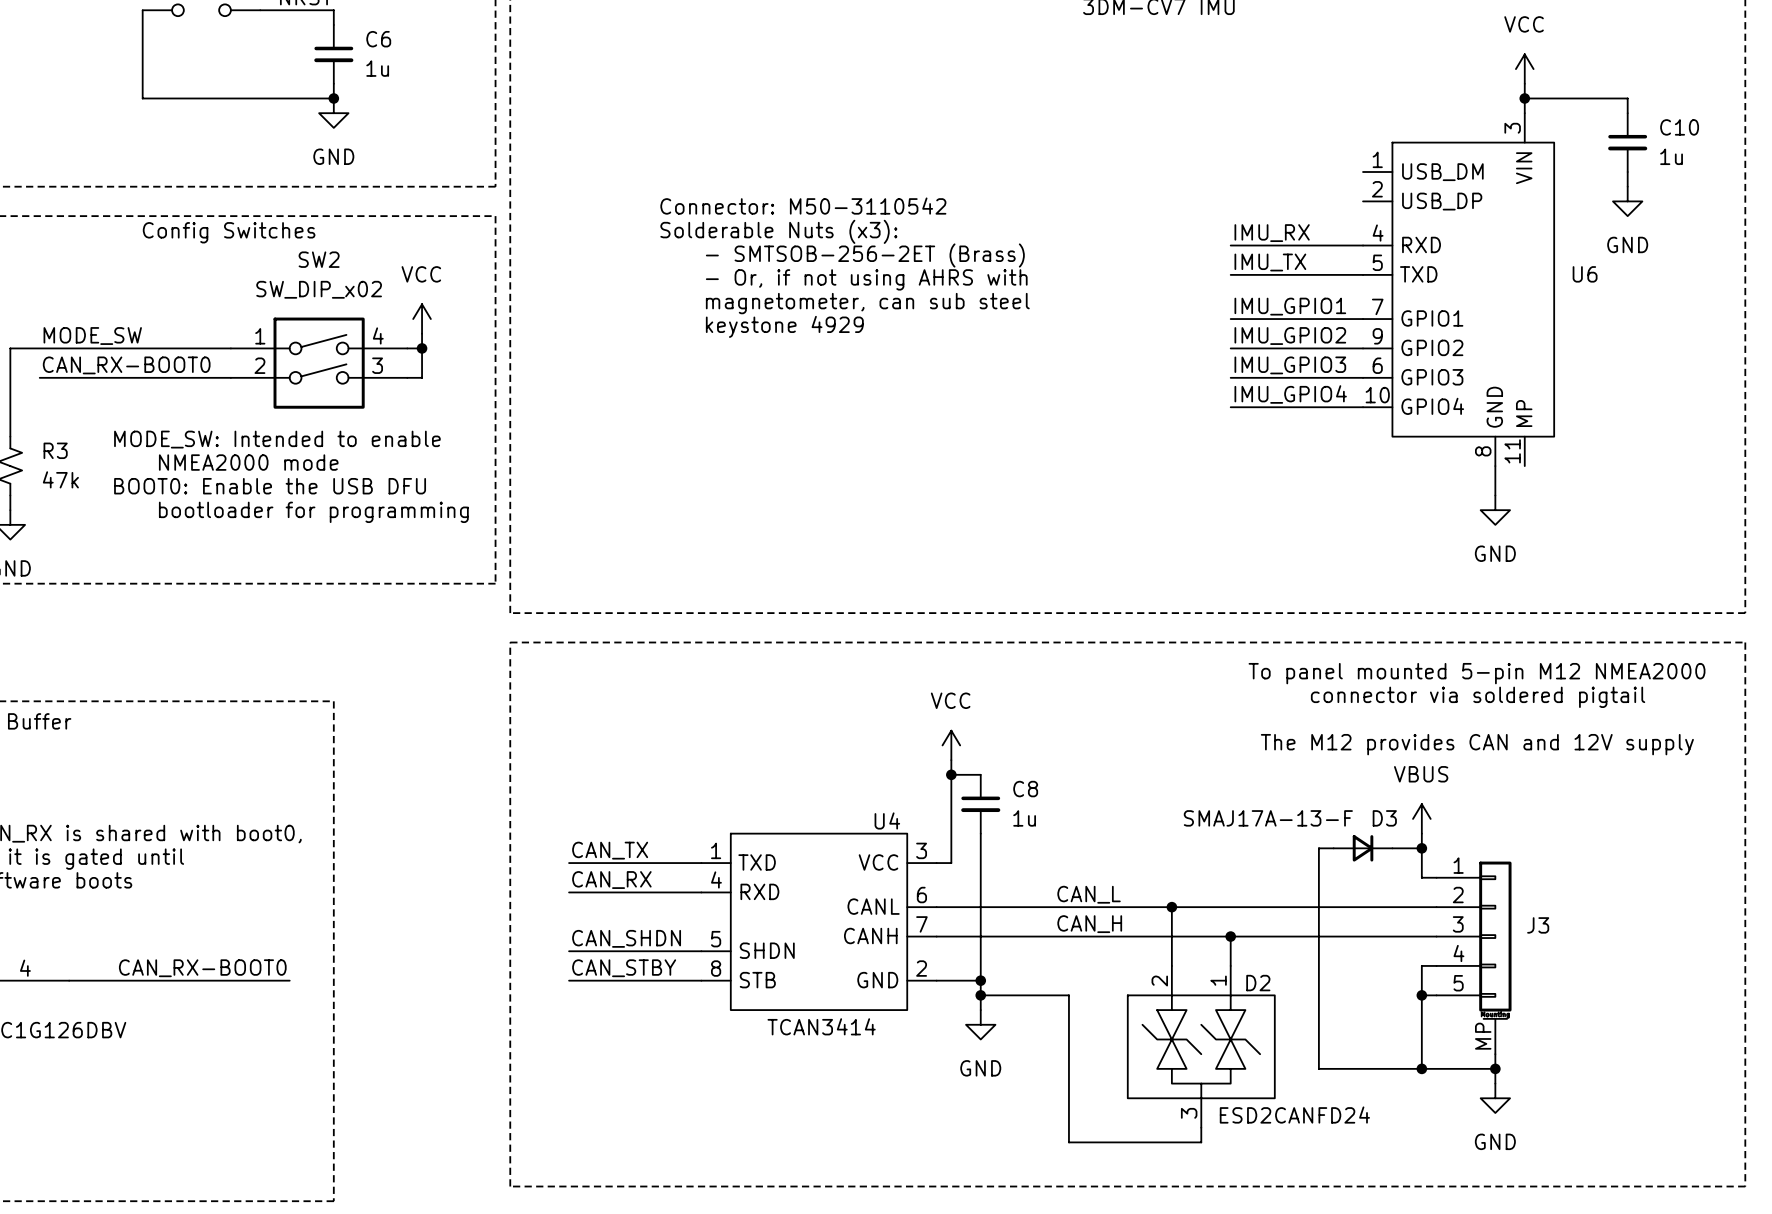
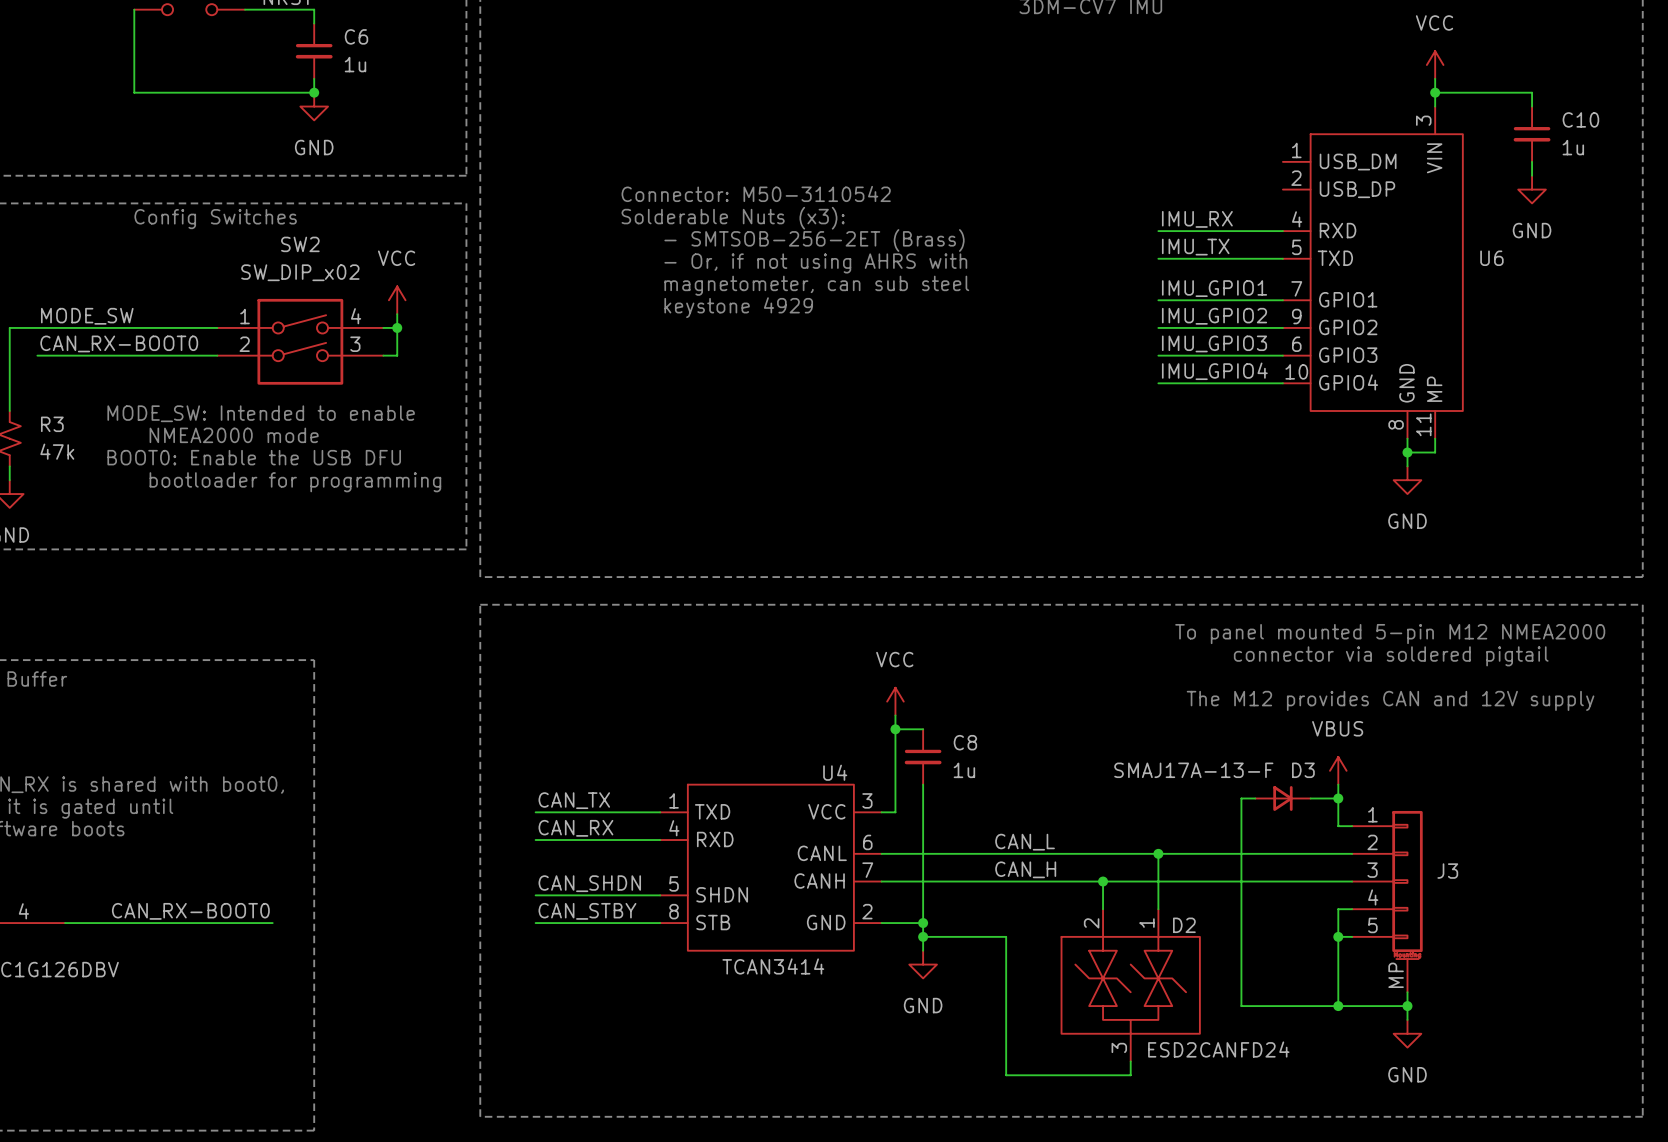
wire: none -> (1435, 438) (1435, 452) (1407, 452)
junction: none -> (1407, 452)
wire: (1171, 907) (1171, 936) -> (1158, 853) (1158, 881)
junction: (1171, 907) -> none
junction: none -> (1158, 853)
junction: none -> (1103, 881)
junction: (1230, 936) -> none

